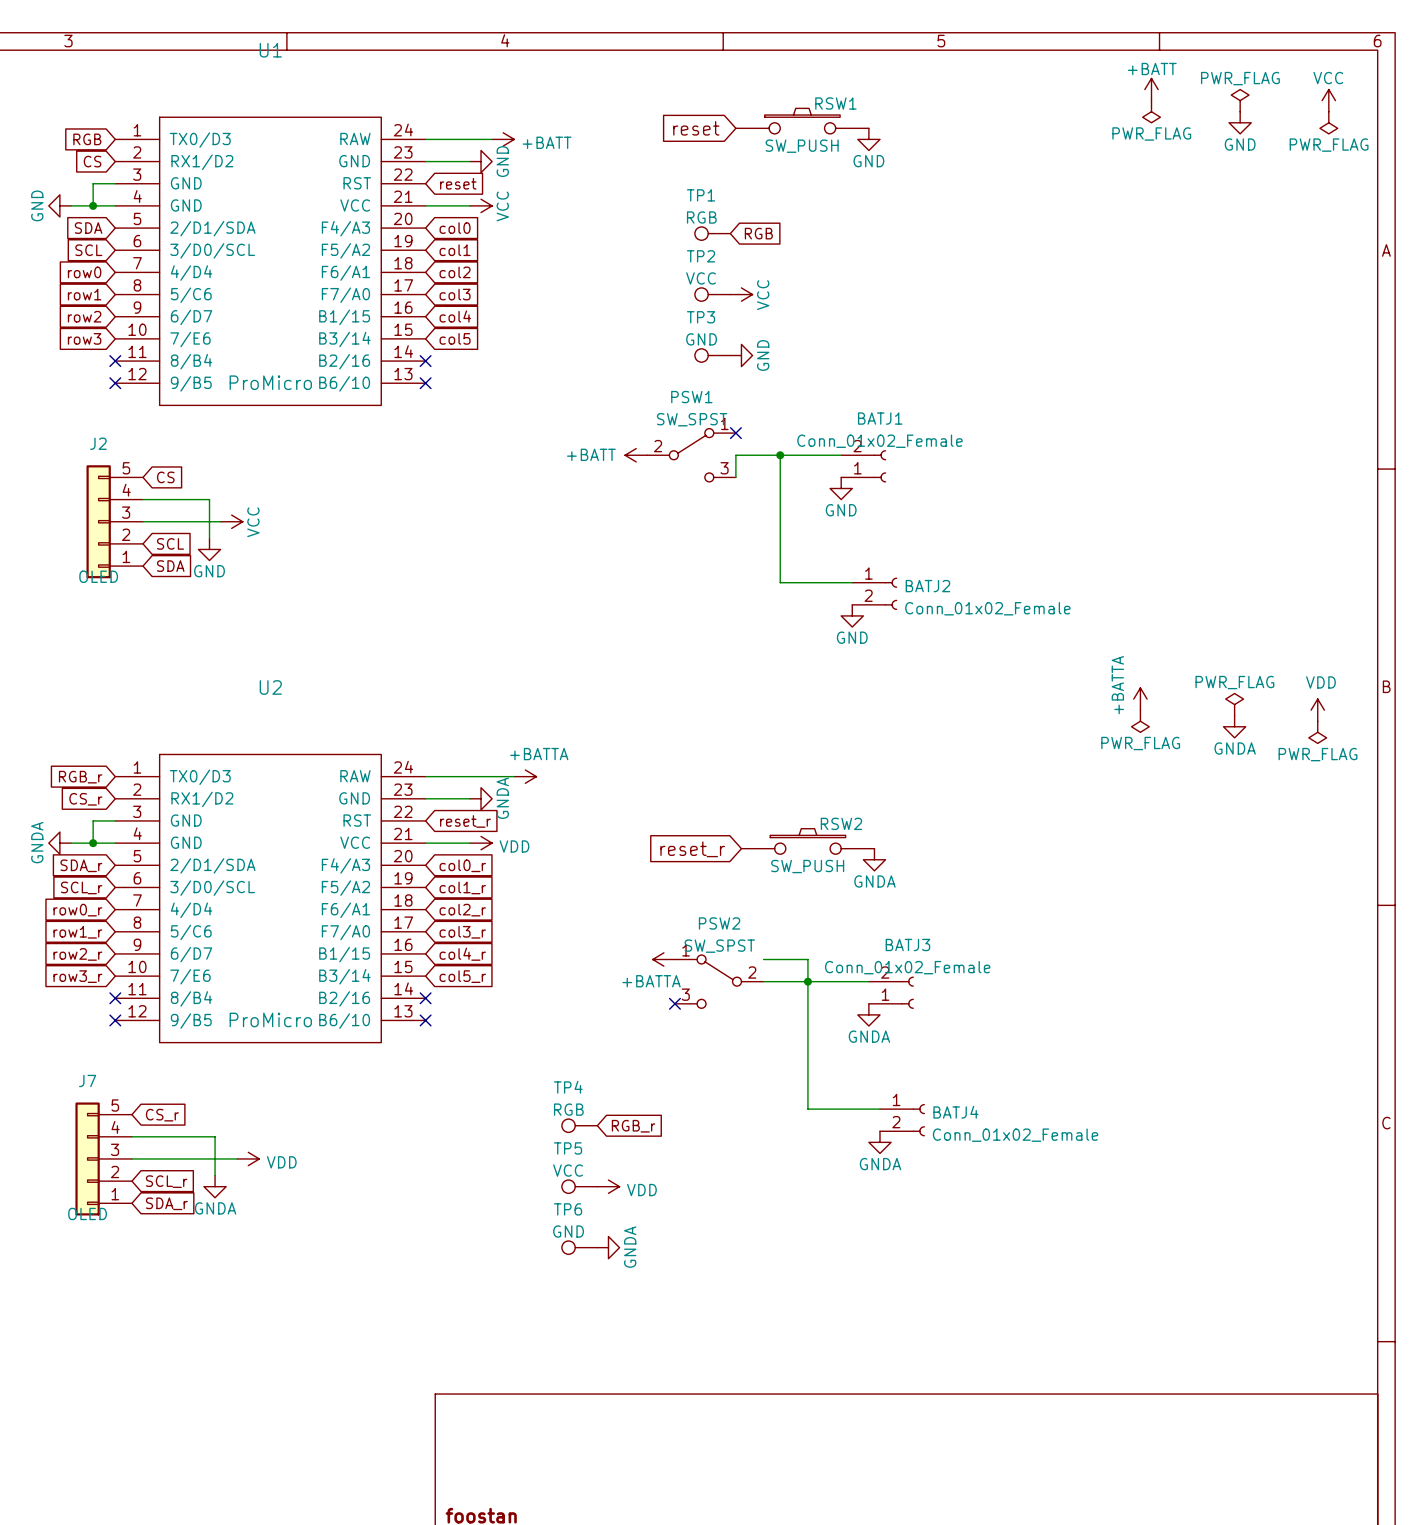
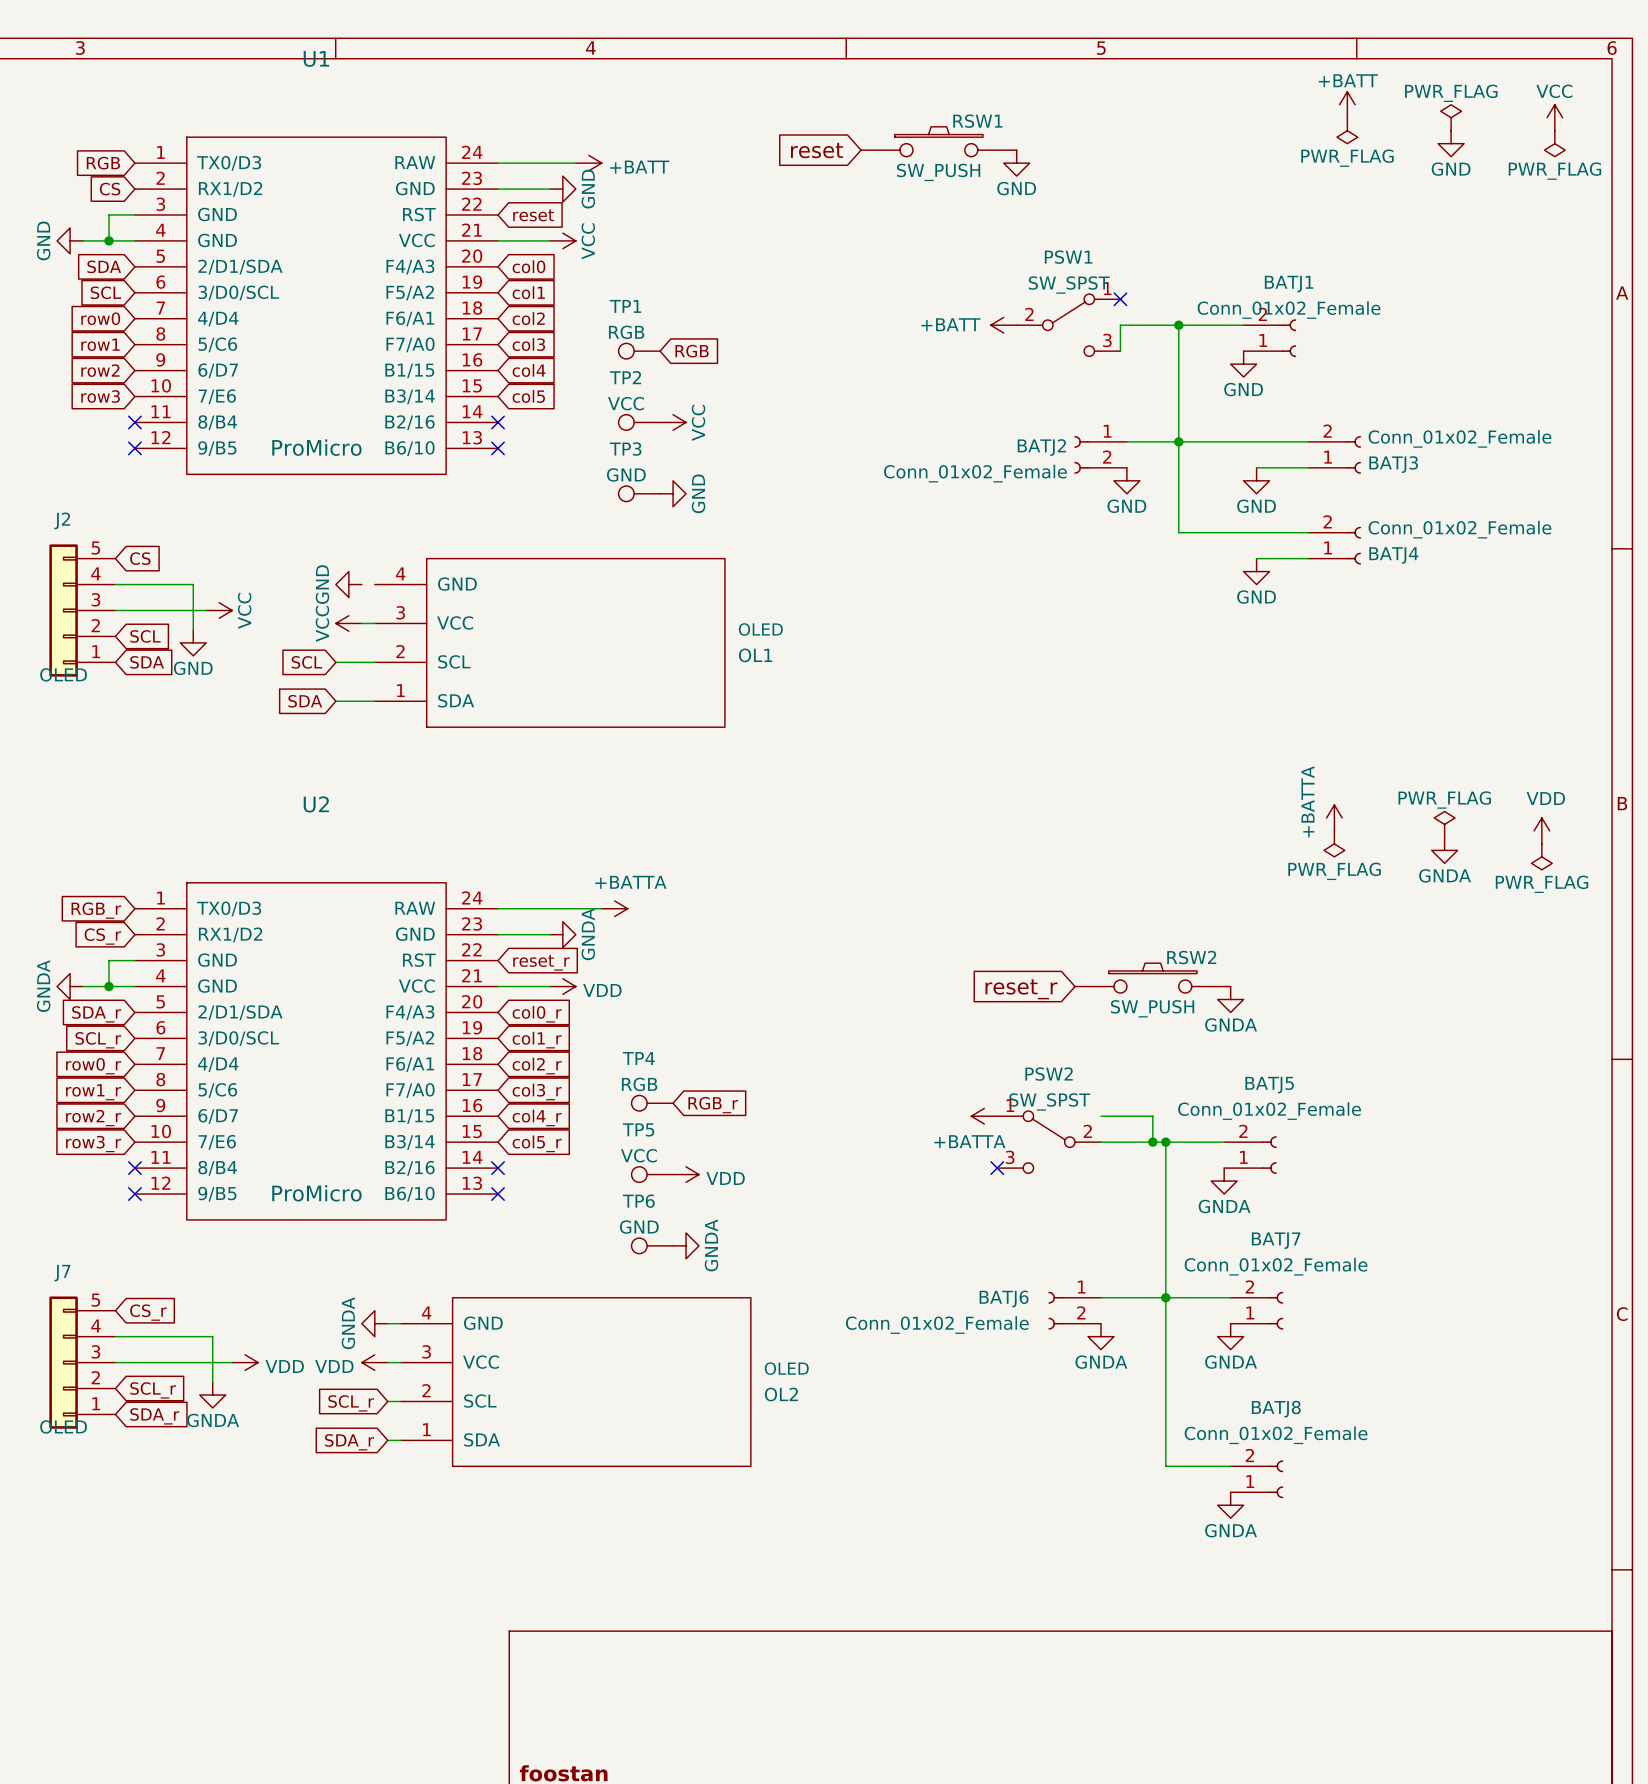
TP1 position: (712, 233) -> (639, 351)
global label position: RGB (758, 233) -> RGB (692, 351)
no-connect mark: none -> (1120, 299)
power symbol: none -> +BATT (1003, 325)
wire: none -> (1178, 325) (1178, 532) (1308, 532)
junction: none -> (1178, 325)
wire: none -> (1243, 325) (1120, 325) (1120, 351)
TP2 position: (712, 294) -> (639, 422)
power symbol position: VCC (741, 294) -> VCC (673, 422)
power symbol: none -> GND (1243, 364)
TP3 position: (712, 355) -> (639, 493)
power symbol: GND (741, 355) -> none
wire: none -> (1126, 441) (1308, 441)
junction: none -> (1178, 441)
wire: none -> (1256, 467) (1308, 467)
power symbol: none -> GND (1126, 480)
power symbol: none -> GND (1256, 480)
power symbol: none -> GND (673, 493)
no-connect mark: (735, 433) -> none
power symbol: +BATT (636, 455) -> none
PSW1 position: (691, 455) -> (1068, 325)
wire: (780, 455) (780, 582) (852, 582) -> none
junction: (780, 455) -> none
wire: (841, 455) (735, 455) (735, 477) -> none
BATJ1 position: (863, 466) -> (1269, 338)
global label position: CS (165, 477) -> CS (140, 558)
wire: none -> (1256, 558) (1308, 558)
power symbol: GND (841, 488) -> none
power symbol: none -> GND (1256, 571)
wire: (165, 499) (209, 499) (209, 538) -> (193, 584) (193, 629)
power symbol: none -> GND (348, 584)
J2 position: (114, 521) -> (82, 610)
power symbol: none -> VCC (219, 610)
power symbol: VCC (231, 521) -> none
power symbol: none -> VCC (348, 623)
wire: none -> (361, 623) (374, 623)
global label position: SCL (170, 543) -> SCL (145, 636)
power symbol position: GND (209, 549) -> GND (193, 642)
OL1: none -> OLED (549, 642)
global label position: SDA (170, 566) -> SDA (147, 662)
global label: none -> SCL (306, 662)
wire: none -> (335, 662) (374, 662)
BATJ2 position: (874, 593) -> (1100, 454)
BATJ2 flip: as is (891, 593) -> left-right (1081, 454)
global label: none -> SDA (305, 701)
wire: none -> (335, 701) (374, 701)
power symbol: GND (852, 615) -> none
RSW2 position: (807, 841) -> (1152, 978)
global label position: reset_r (692, 849) -> reset_r (1021, 989)
power symbol: none -> GNDA (1230, 999)
power symbol: GNDA (874, 859) -> none
BATJ3 name position: BATJ3 (907, 944) -> BATJ3 (1393, 464)
wire: none -> (1100, 1116) (1152, 1116) (1152, 1142)
power symbol position: +BATTA (663, 959) -> +BATTA (984, 1116)
wire: (763, 959) (807, 959) (807, 1109) (879, 1109) -> none
BATJ3 value position: Conn_01x02_Female (907, 967) -> Conn_01x02_Female (1459, 438)
junction: none -> (1152, 1142)
wire: none -> (1165, 1142) (1165, 1466) (1230, 1466)
junction: none -> (1165, 1142)
PSW2 position: (719, 981) -> (1049, 1142)
wire: (763, 981) (868, 981) -> (1100, 1142) (1224, 1142)
junction: (807, 981) -> none
BATJ5: none -> Conn_01x02_Female (1250, 1155)
BATJ3 position: (891, 992) -> (1334, 454)
no-connect mark: none -> (997, 1168)
power symbol: none -> VDD (686, 1174)
no-connect mark: (674, 1003) -> none
power symbol: none -> GNDA (1224, 1181)
power symbol: GNDA (868, 1014) -> none
power symbol: none -> GNDA (686, 1245)
wire: none -> (1100, 1297) (1230, 1297)
junction: none -> (1165, 1297)
global label position: CS_r (162, 1115) -> CS_r (148, 1312)
BATJ4 position: (902, 1120) -> (1334, 545)
BATJ4 flip: as is (918, 1120) -> up-down (1353, 545)
BATJ6: none -> Conn_01x02_Female (1074, 1310)
BATJ7: none -> Conn_01x02_Female (1256, 1310)
TP4 position: (579, 1125) -> (652, 1103)
global label position: RGB_r (633, 1126) -> RGB_r (713, 1105)
power symbol: none -> GNDA (374, 1323)
wire: none -> (387, 1323) (400, 1323)
wire: (131, 1136) (215, 1136) (215, 1175) -> (115, 1336) (212, 1336) (212, 1382)
power symbol position: GNDA (879, 1142) -> GNDA (1100, 1336)
power symbol: none -> GNDA (1230, 1336)
J7 position: (103, 1158) -> (82, 1362)
wire: (131, 1158) (237, 1158) -> none
power symbol: VDD (248, 1158) -> none
wire: none -> (115, 1362) (232, 1362)
power symbol: none -> VDD (245, 1362)
power symbol: none -> VDD (374, 1362)
wire: none -> (387, 1362) (400, 1362)
global label position: SCL_r (166, 1181) -> SCL_r (153, 1390)
OL2: none -> OLED (575, 1382)
power symbol position: GNDA (215, 1186) -> GNDA (212, 1395)
TP5 position: (579, 1186) -> (652, 1174)
power symbol: VDD (608, 1186) -> none
wire: none -> (387, 1401) (400, 1401)
global label: none -> SCL_r (351, 1403)
global label position: SDA_r (166, 1203) -> SDA_r (154, 1416)
global label: none -> SDA_r (349, 1442)
wire: none -> (387, 1440) (400, 1440)
TP6 position: (579, 1247) -> (652, 1245)
power symbol: GNDA (608, 1247) -> none
BATJ8: none -> Conn_01x02_Female (1256, 1479)
power symbol: none -> GNDA (1230, 1505)

